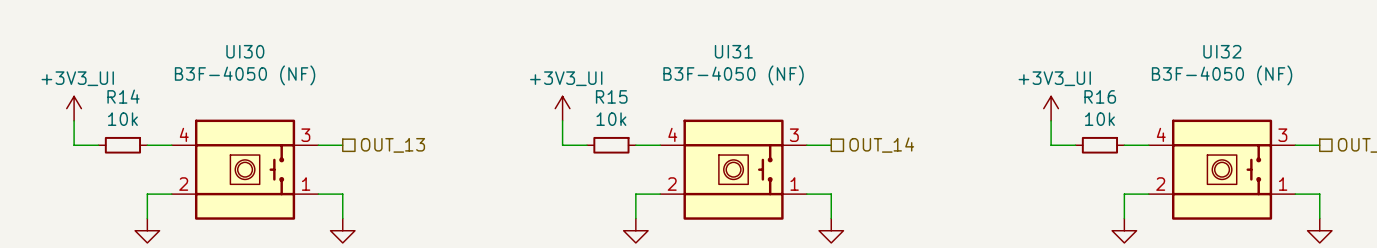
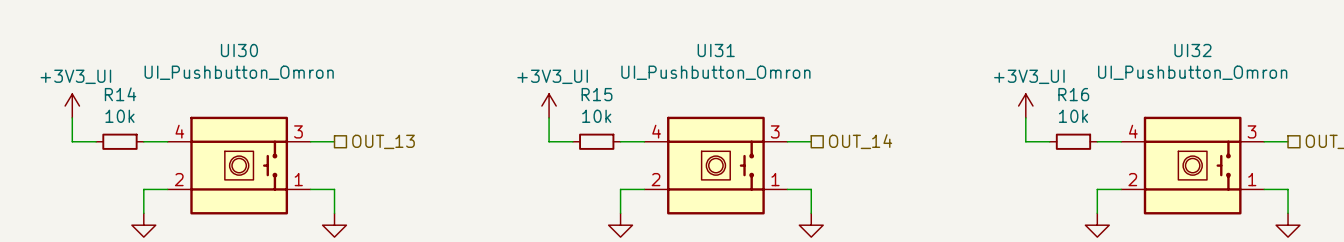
UI30 value: B3F-4050 (NF) (245, 75) -> UI_Pushbutton_Omron (239, 72)
UI31 value: B3F-4050 (NF) (733, 75) -> UI_Pushbutton_Omron (715, 72)
UI32 value: B3F-4050 (NF) (1222, 75) -> UI_Pushbutton_Omron (1192, 72)

